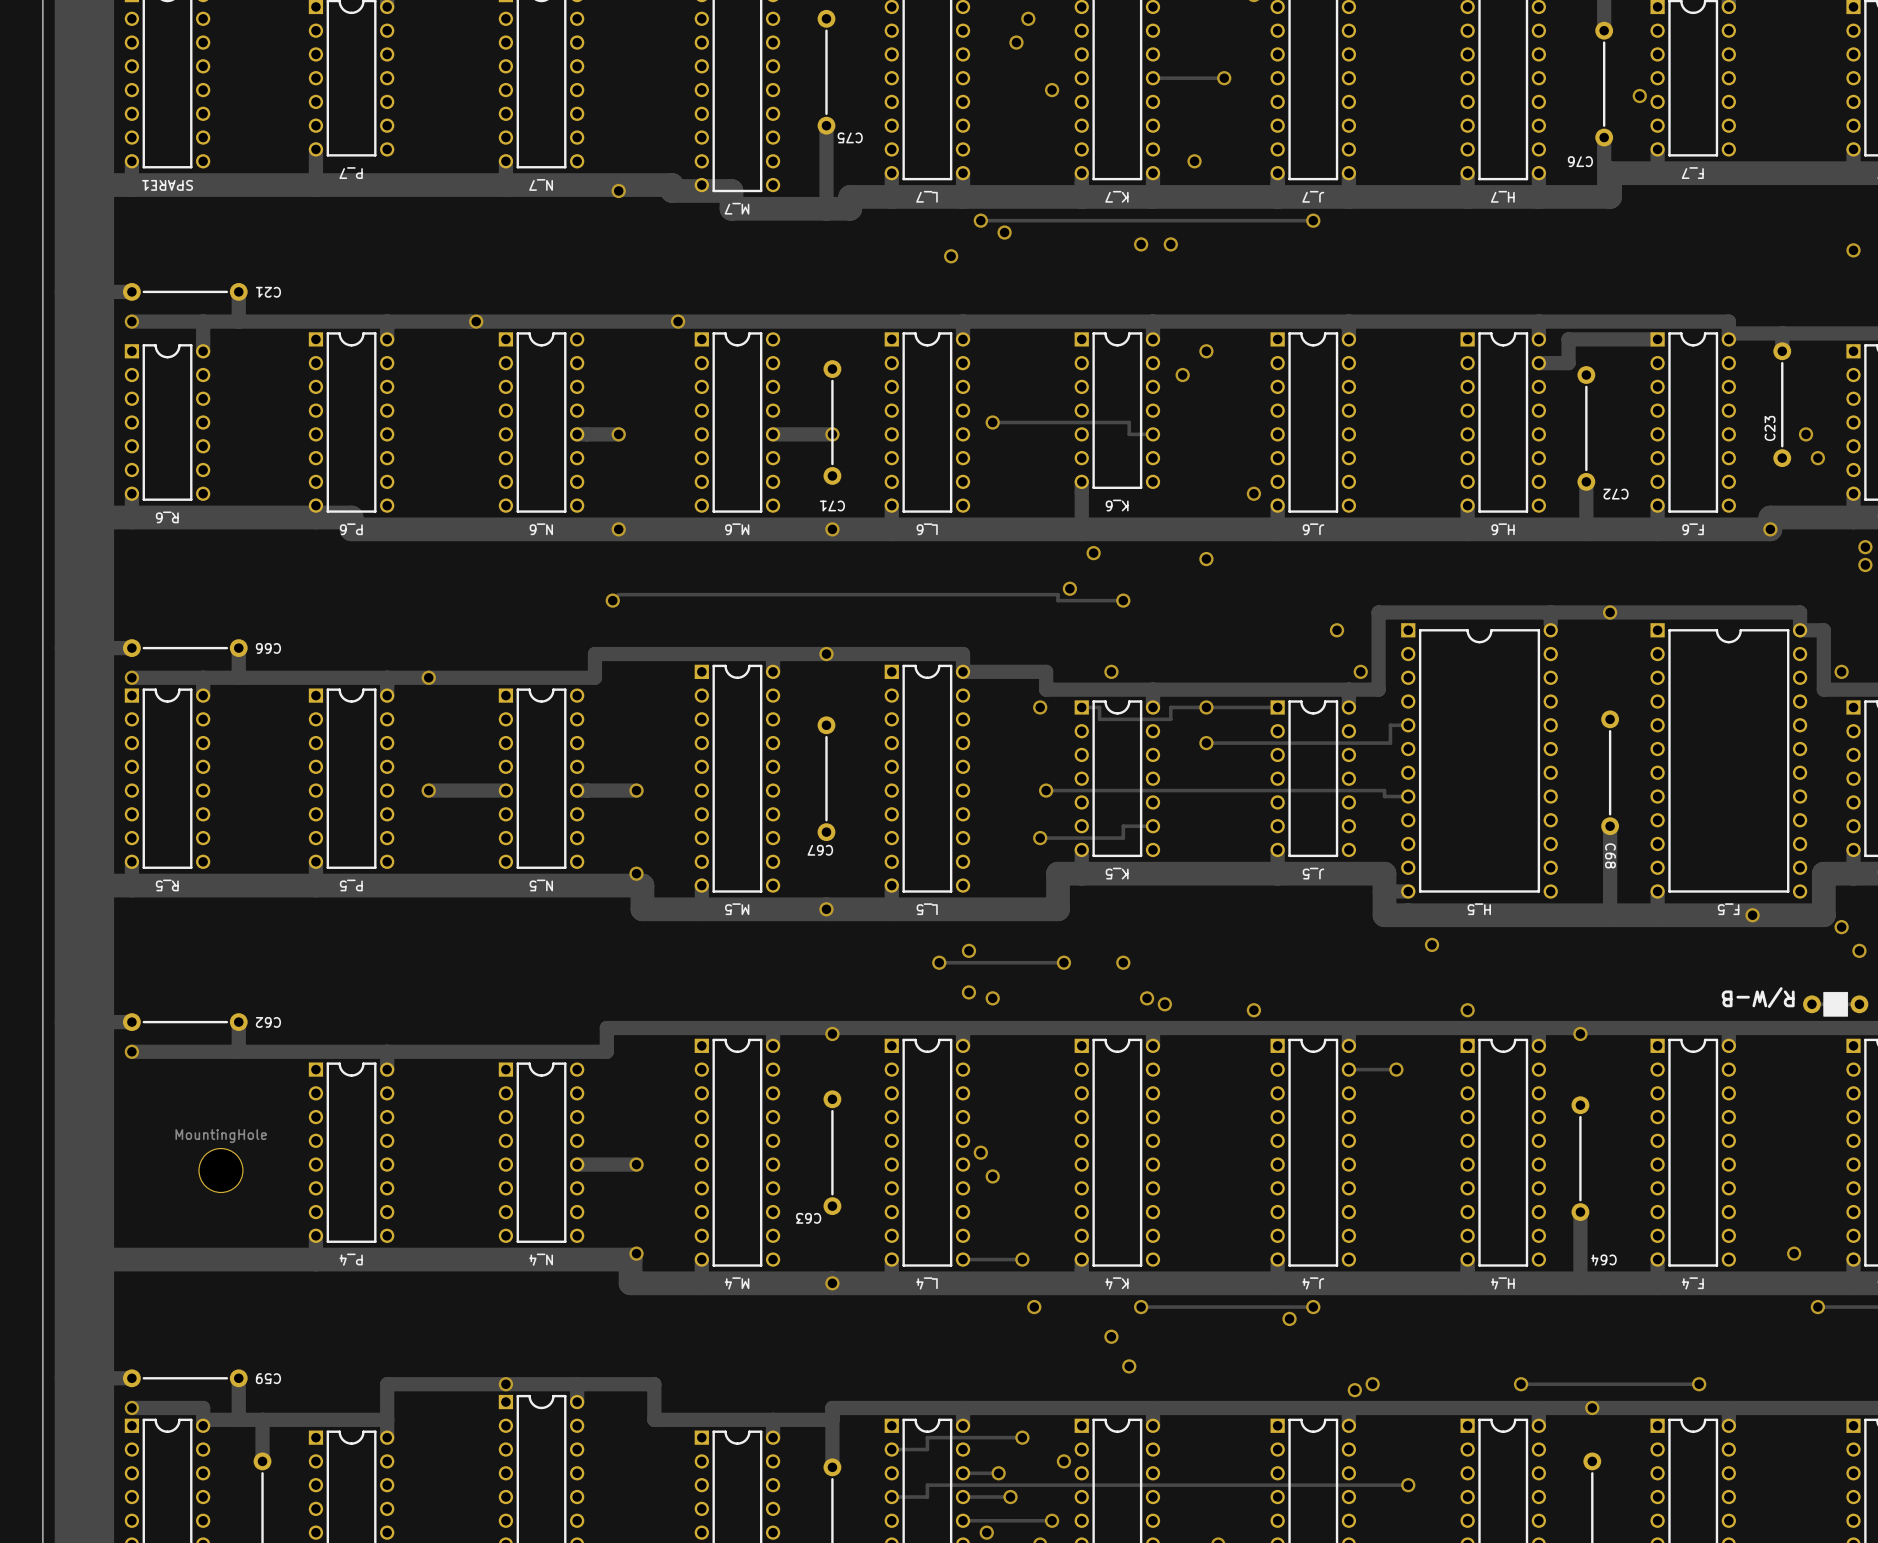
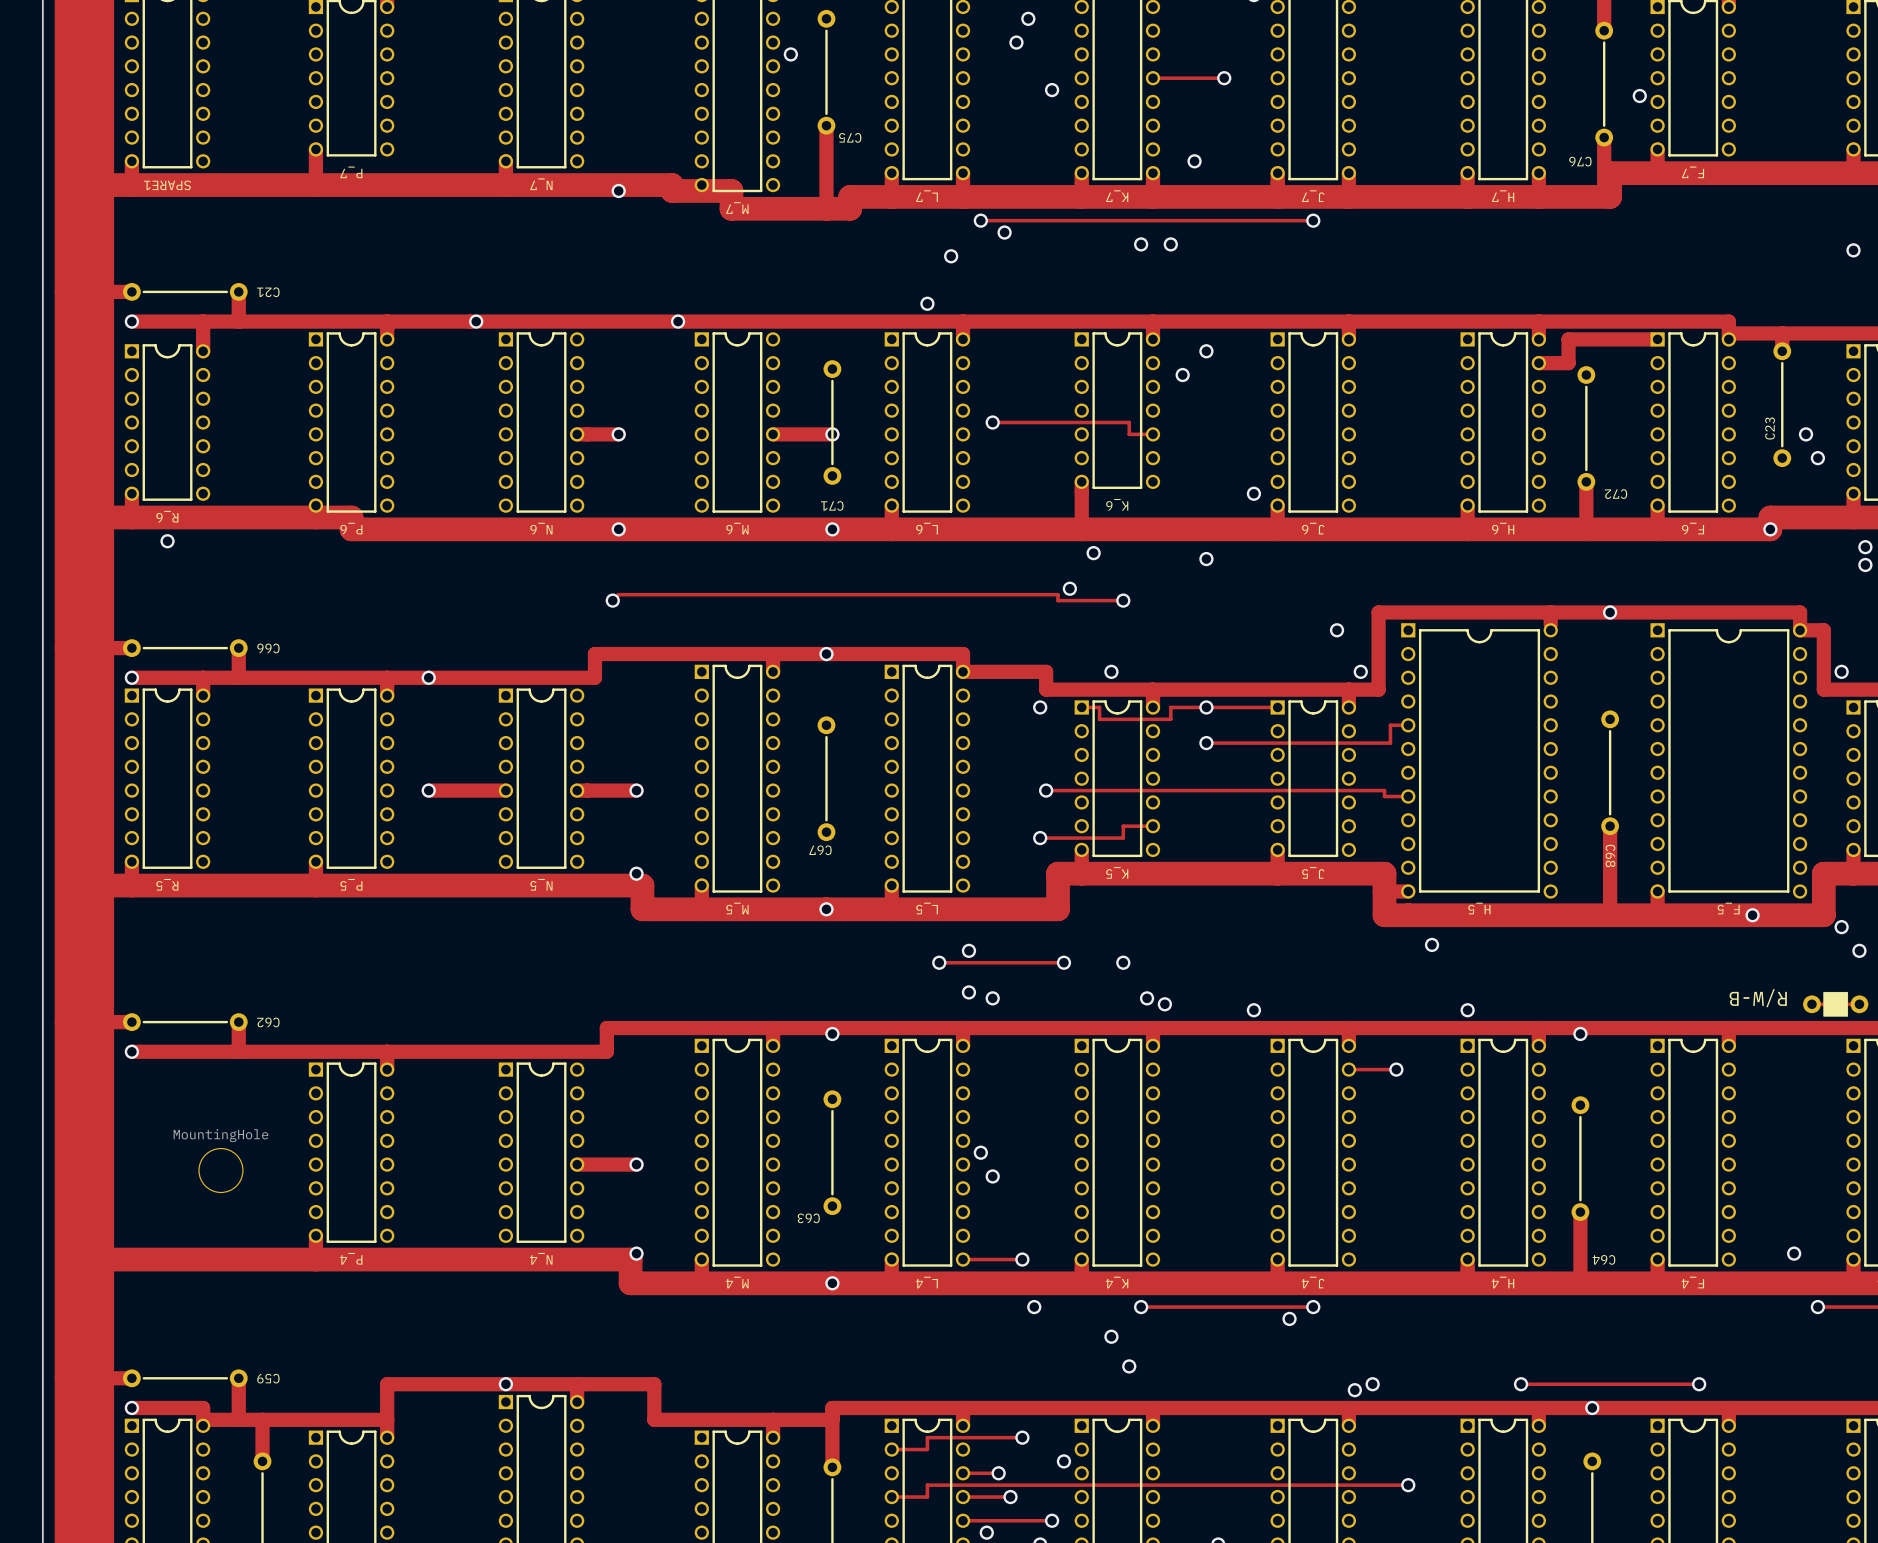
via: none -> (790, 54)
via: none -> (927, 303)
via: none -> (167, 541)

